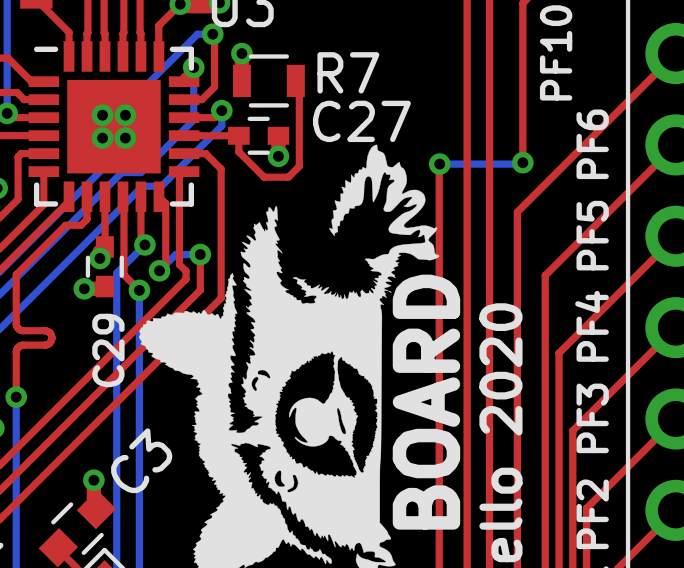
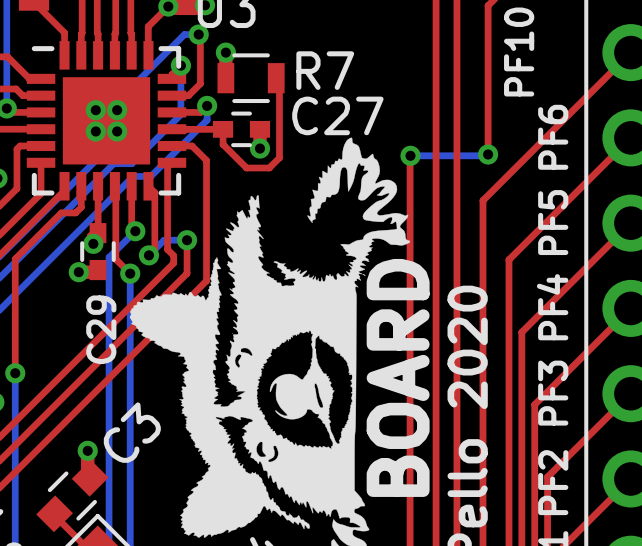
top track: (16, 323) (17, 328) (21, 330) (47, 331) (51, 337) (50, 342) (46, 344) (20, 345) (16, 352) -> (15, 304) (15, 331)

